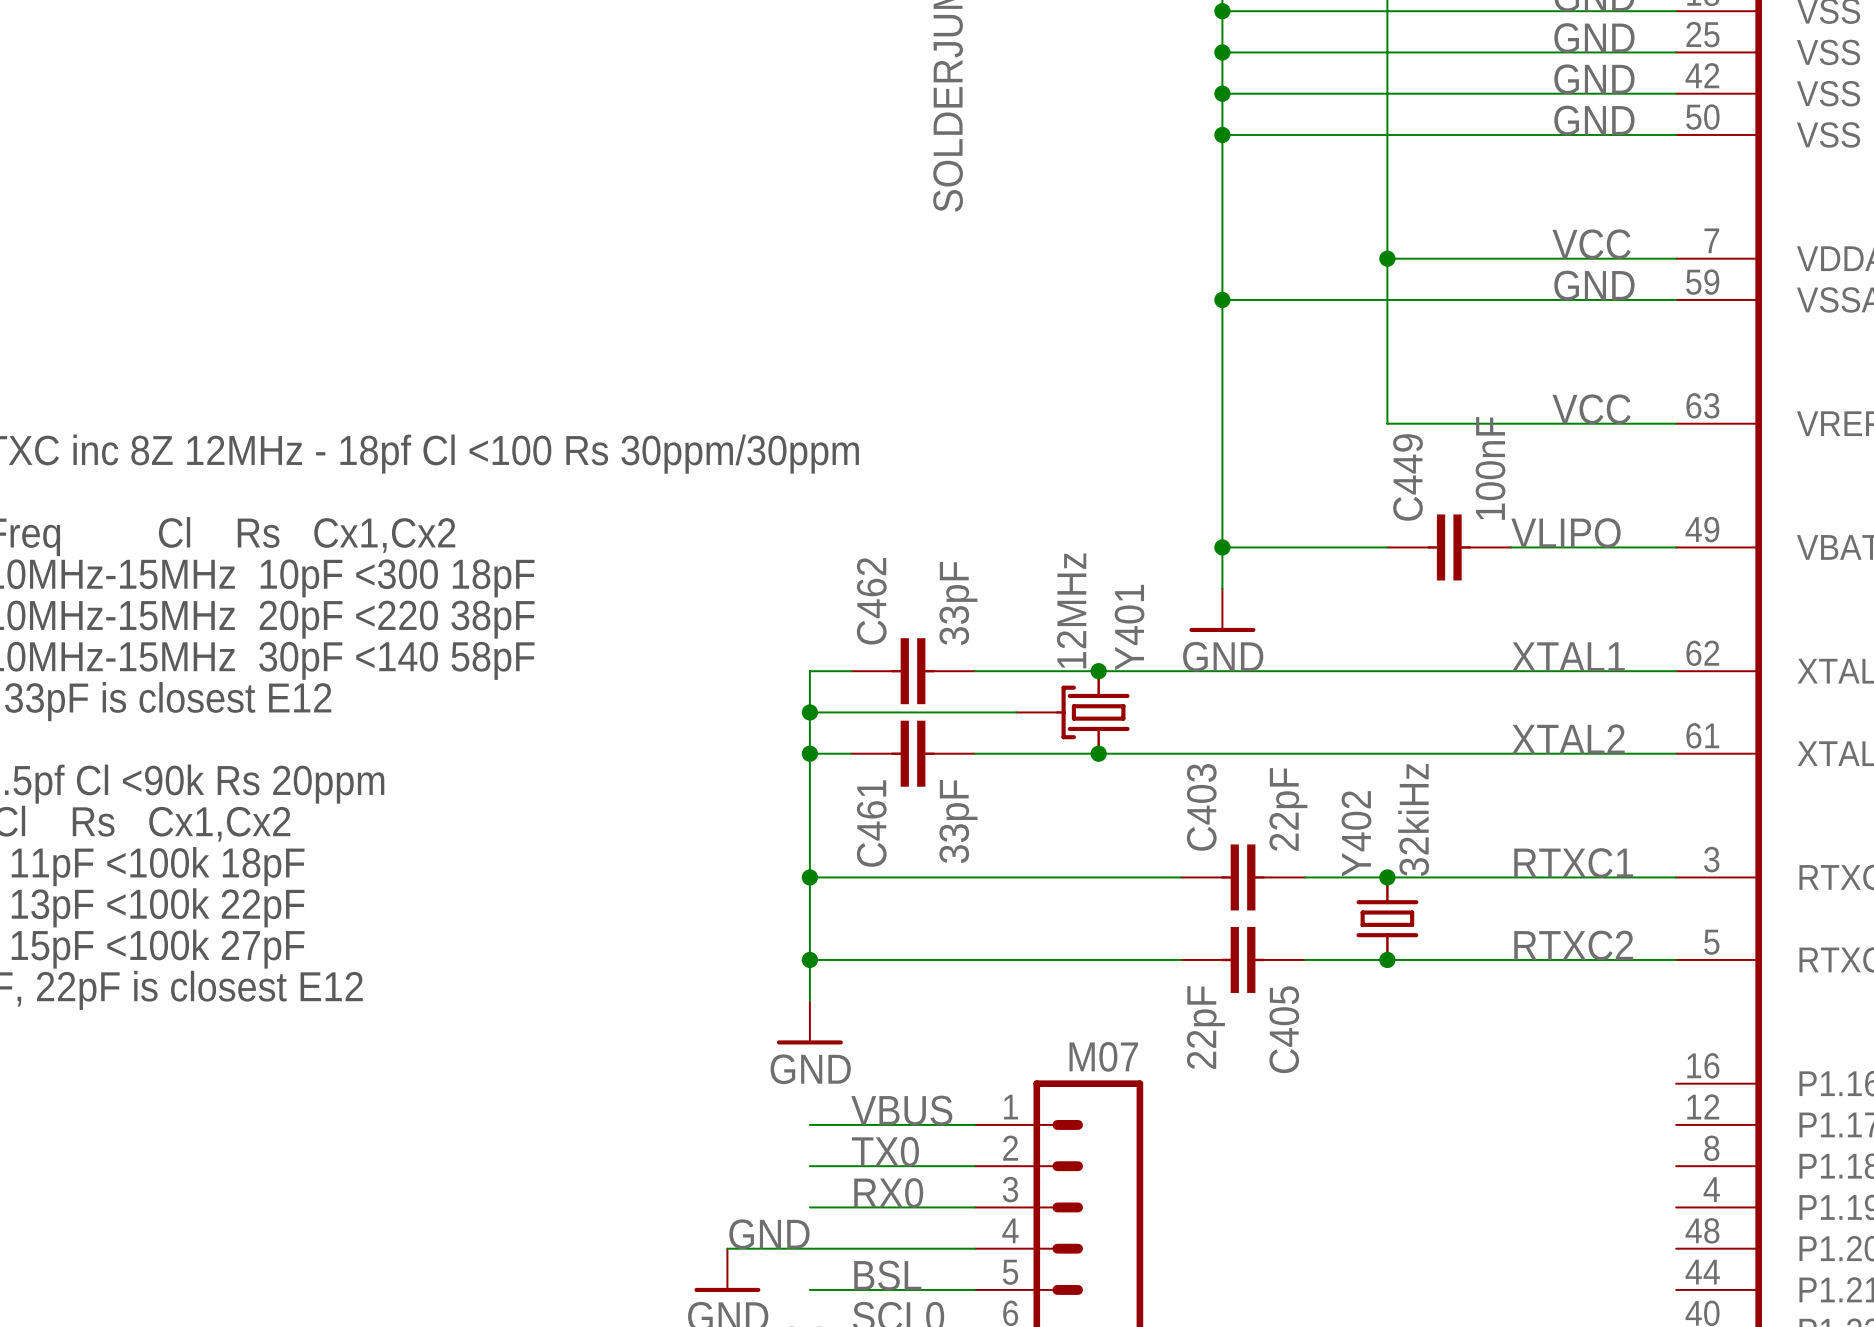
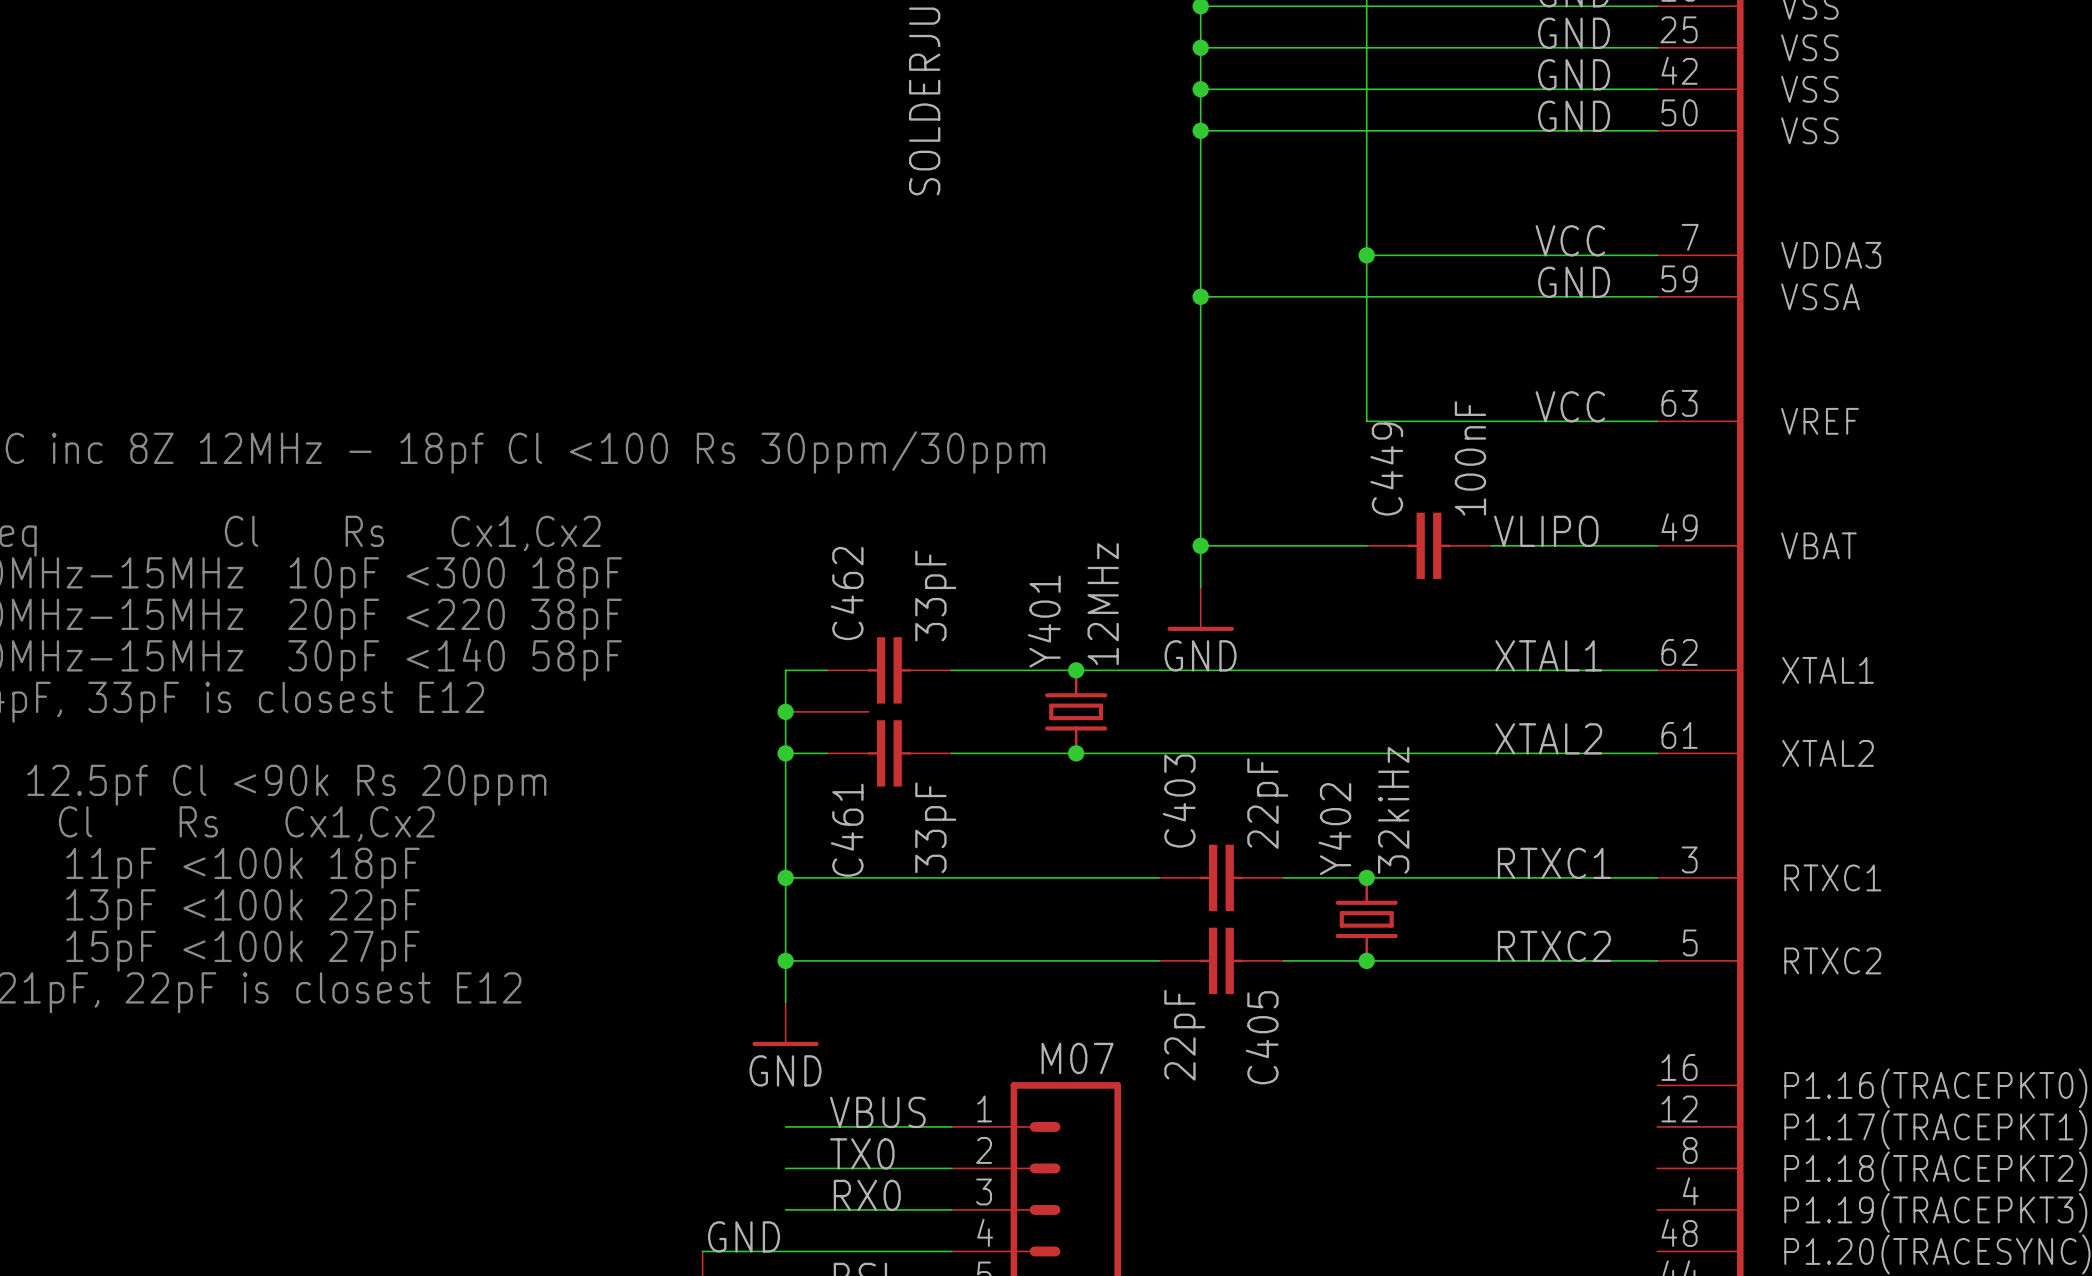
Y401 name position: Y401 (1129, 627) -> Y401 (1044, 621)
Y401 symbol: [1016, 669, 1130, 755] -> [1045, 669, 1108, 755]
wire: (809, 712) (1016, 712) -> none
part: none -> (827, 711)

